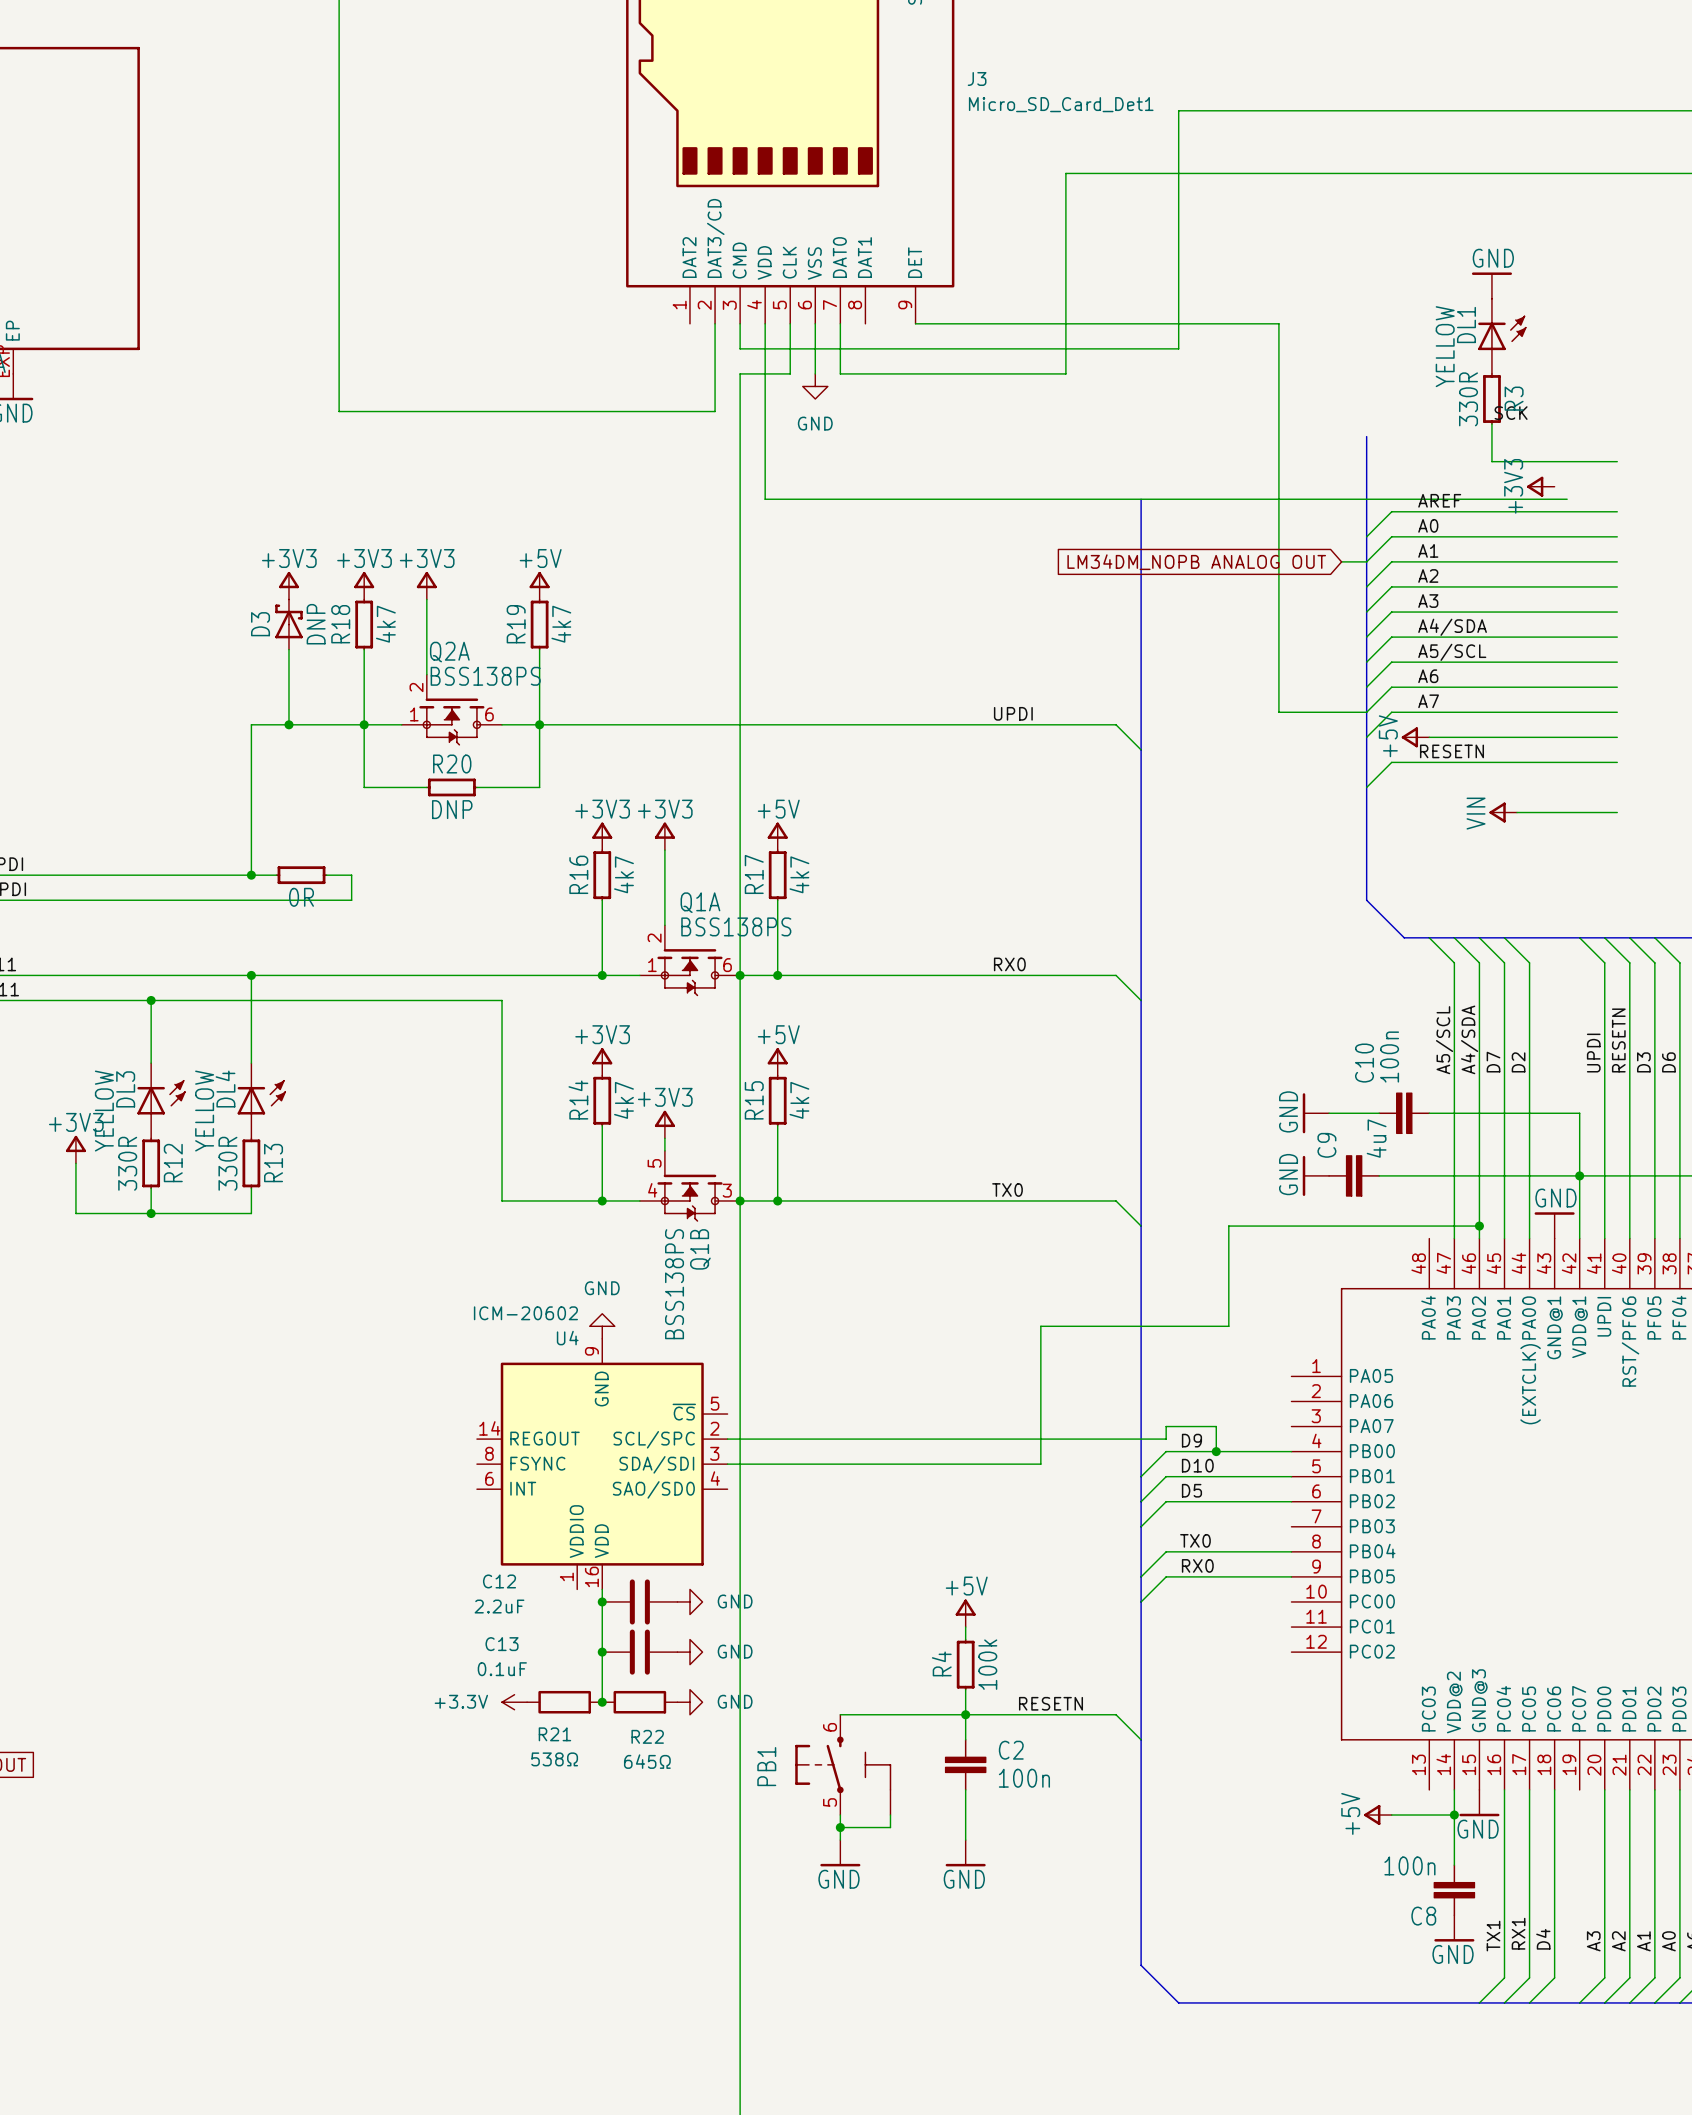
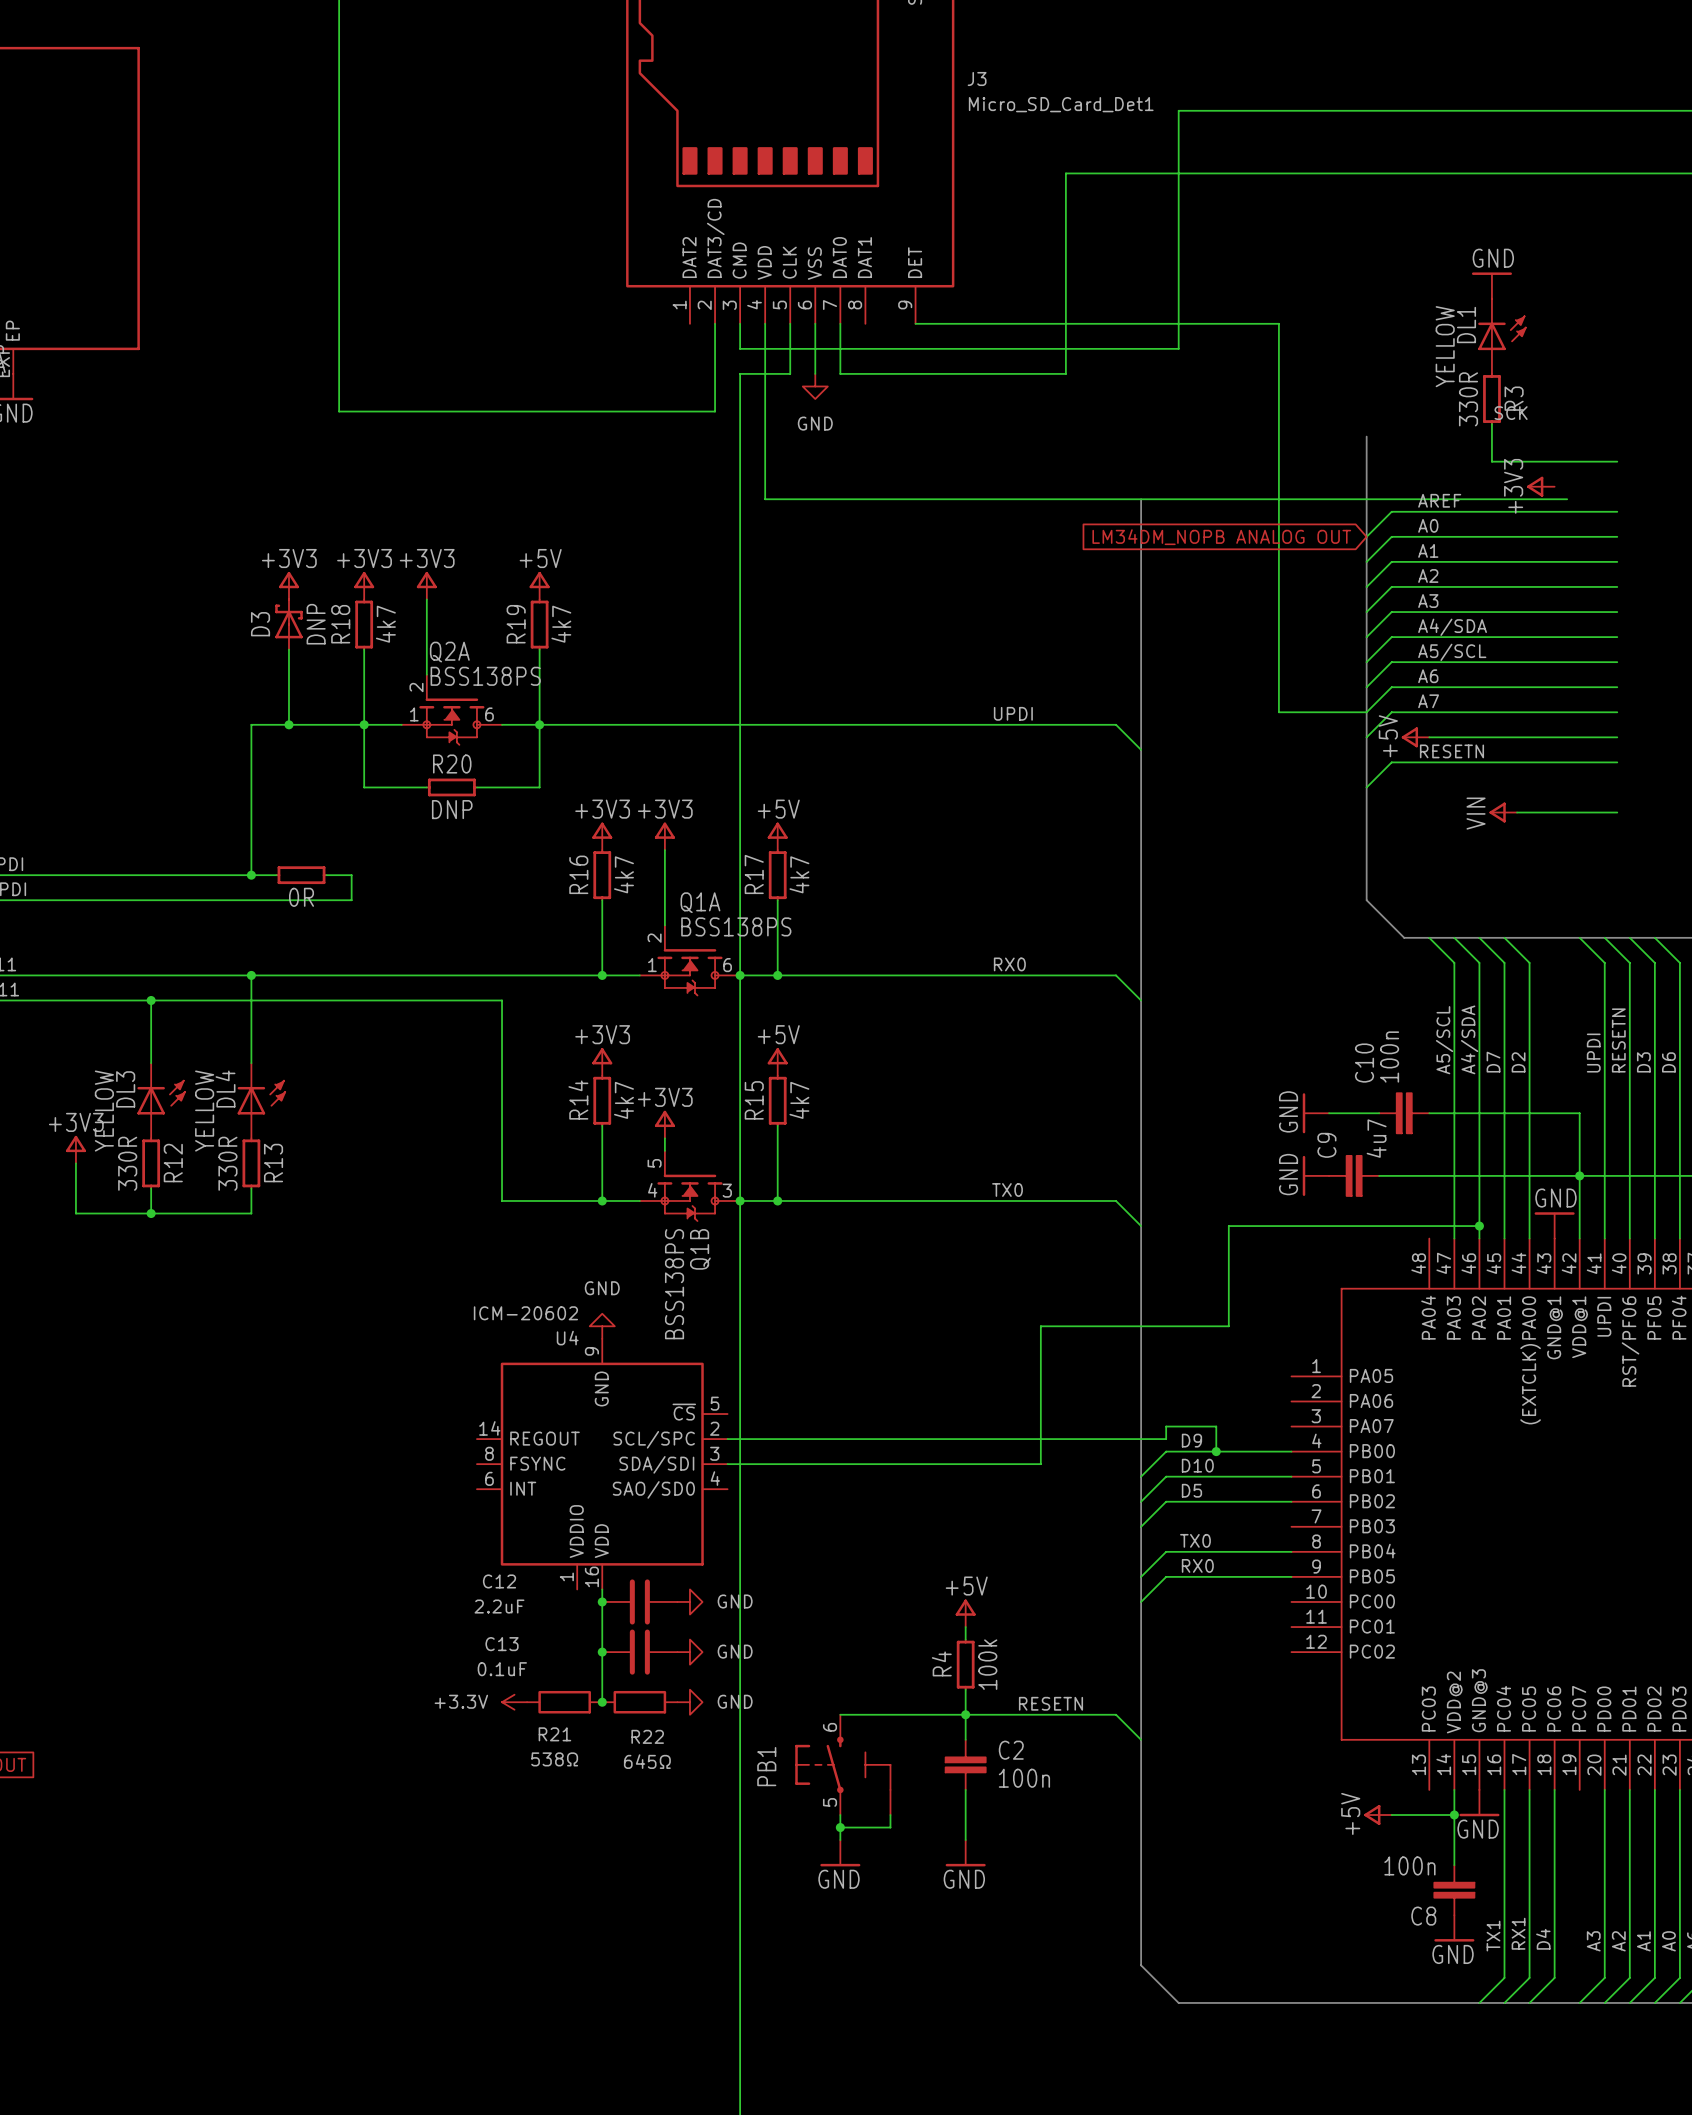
wire: (1341, 561) (1366, 561) -> none
global label position: LM34DM_NOPB ANALOG OUT (1196, 562) -> LM34DM_NOPB ANALOG OUT (1221, 537)

